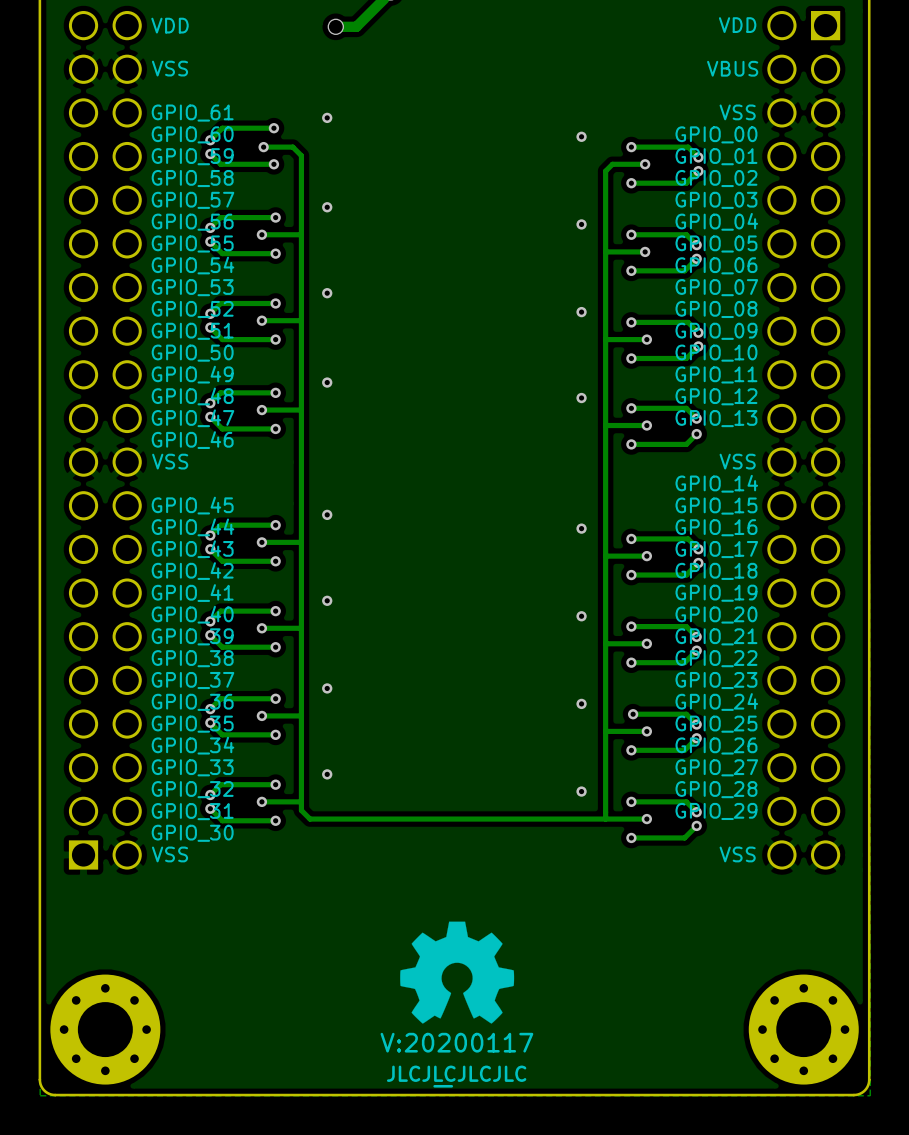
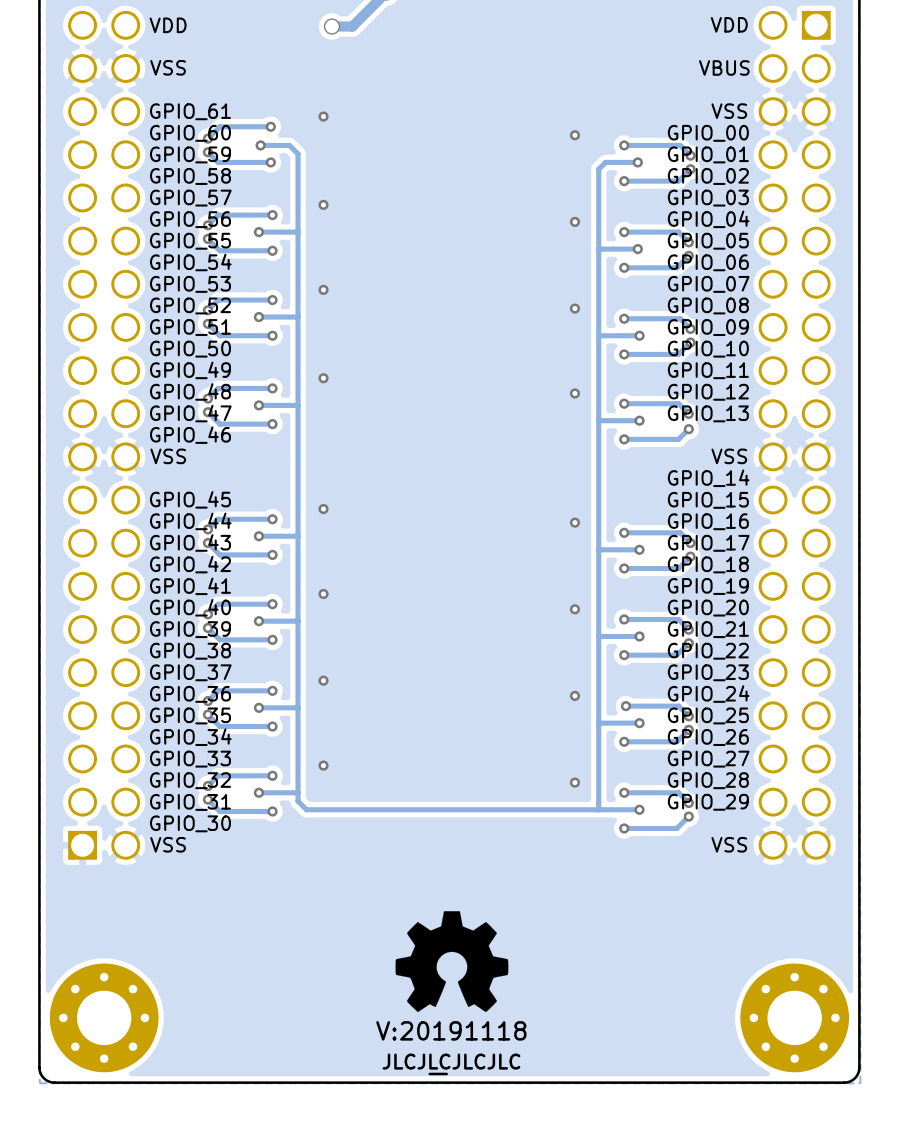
drawing shape: [380, 1032, 534, 1053] -> [376, 1021, 527, 1041]

